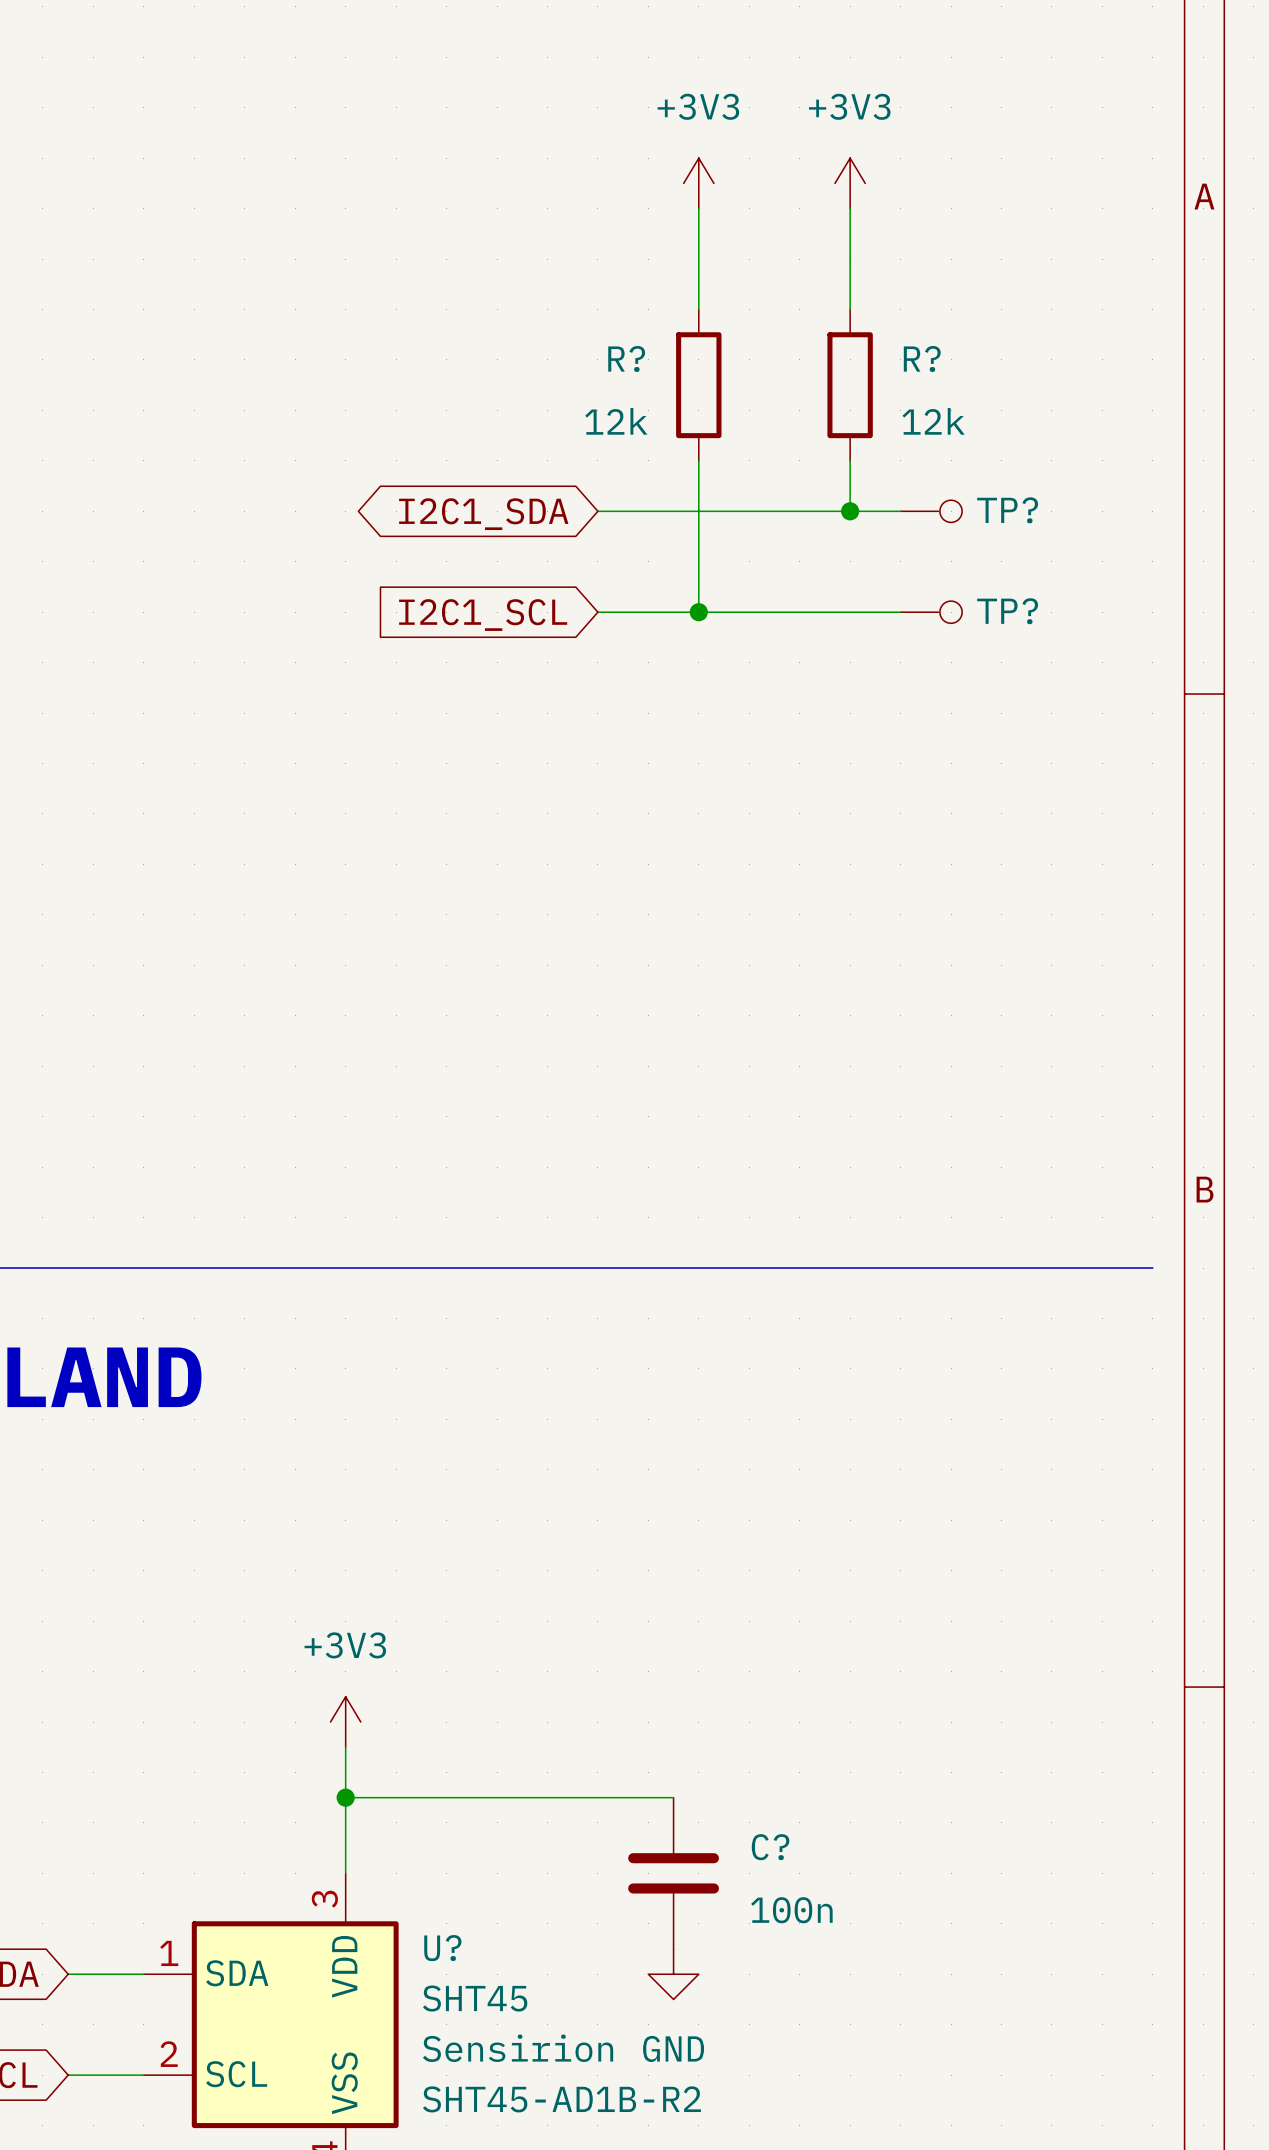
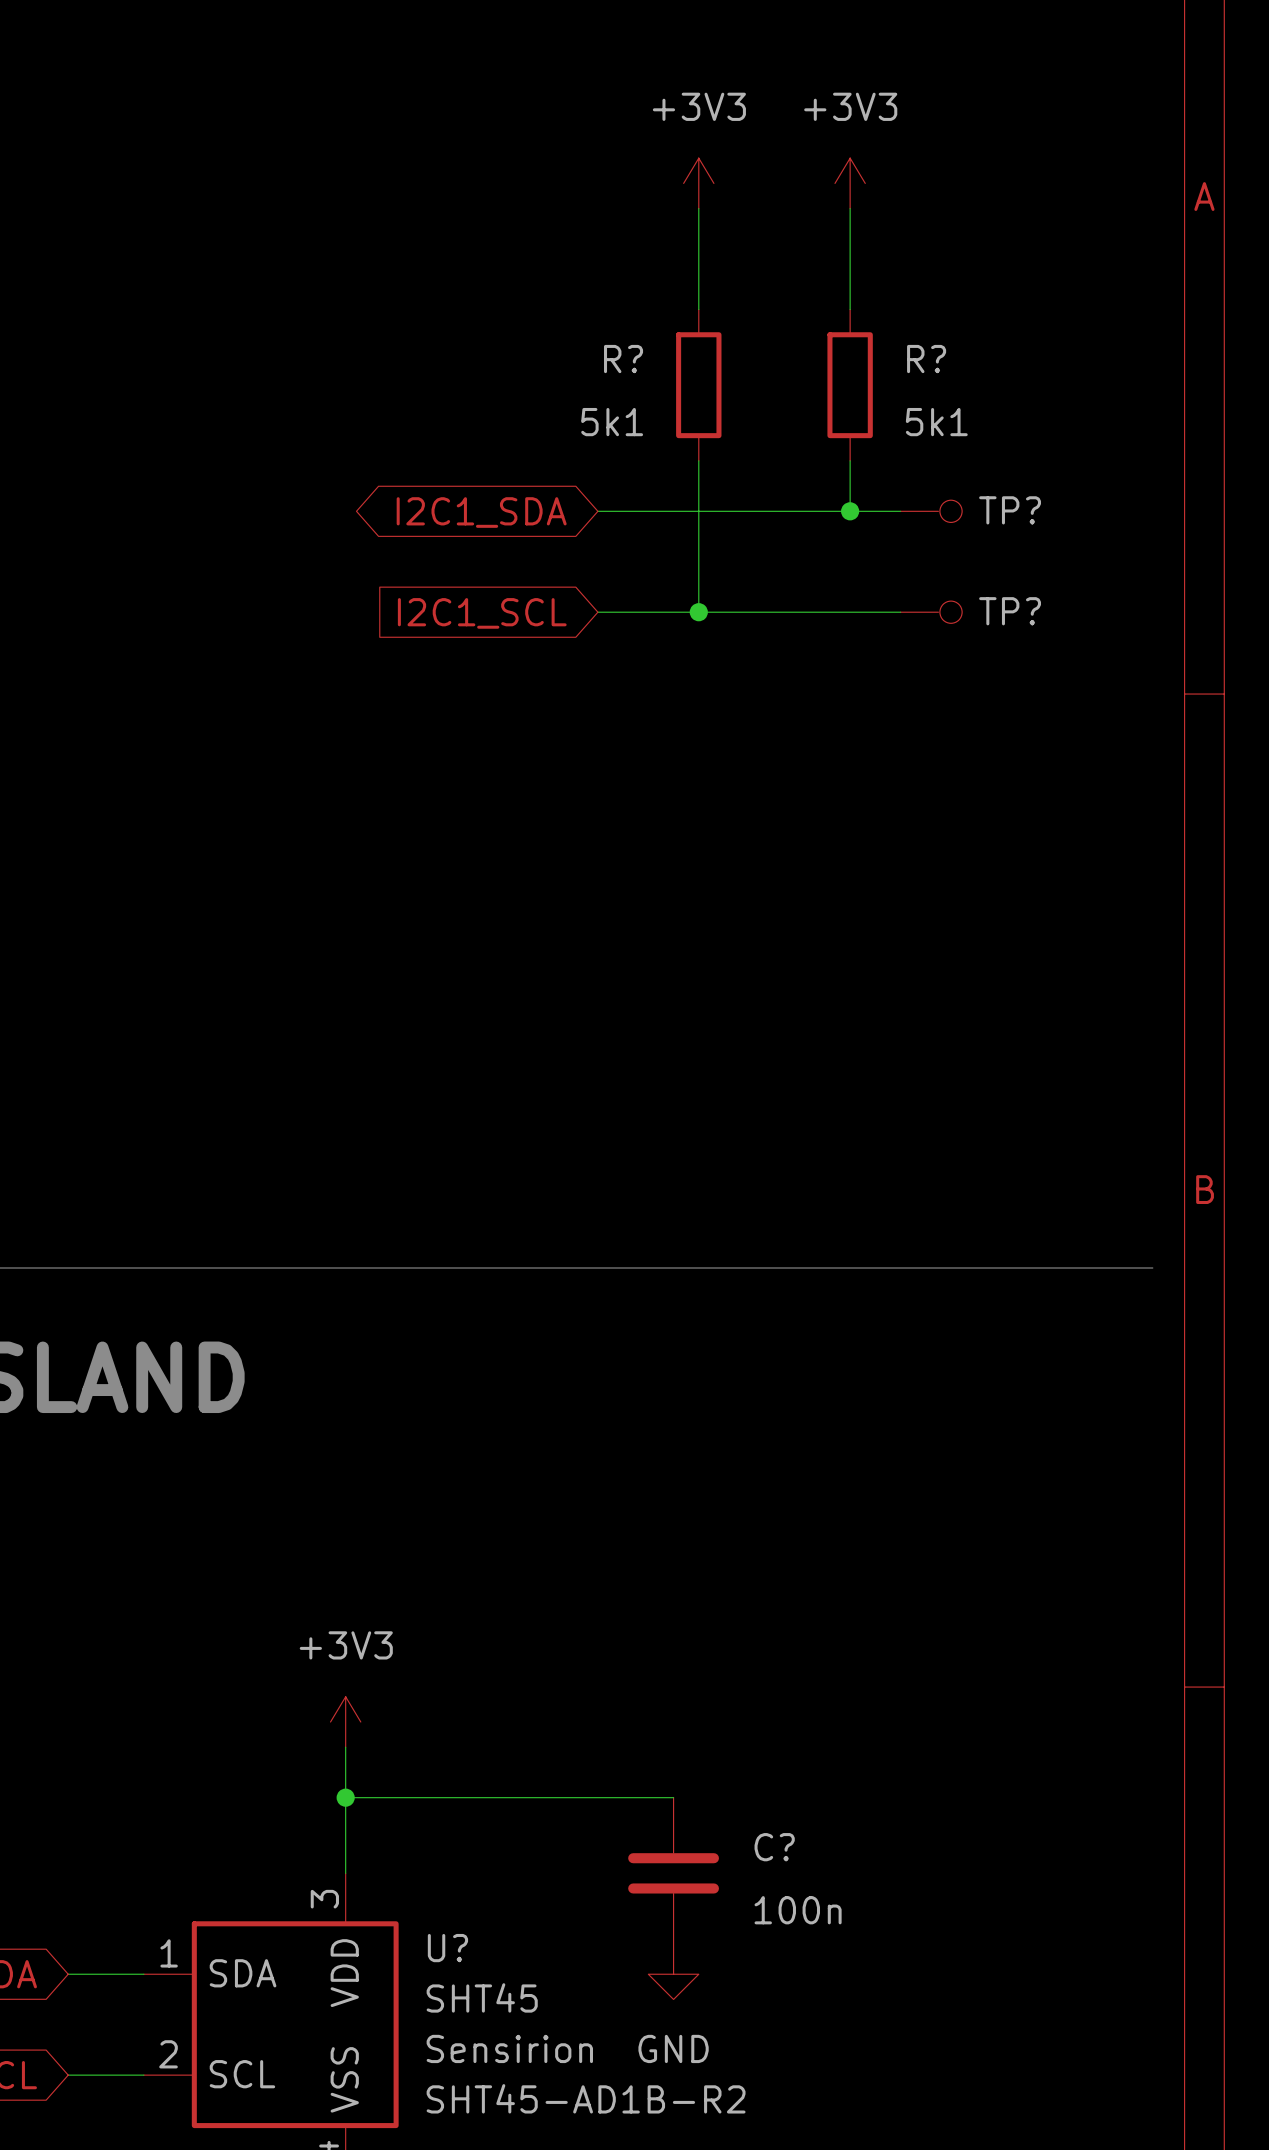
R? text: 12k (616, 421) -> 5k1 (612, 422)
R? text: 12k (933, 421) -> 5k1 (936, 422)

